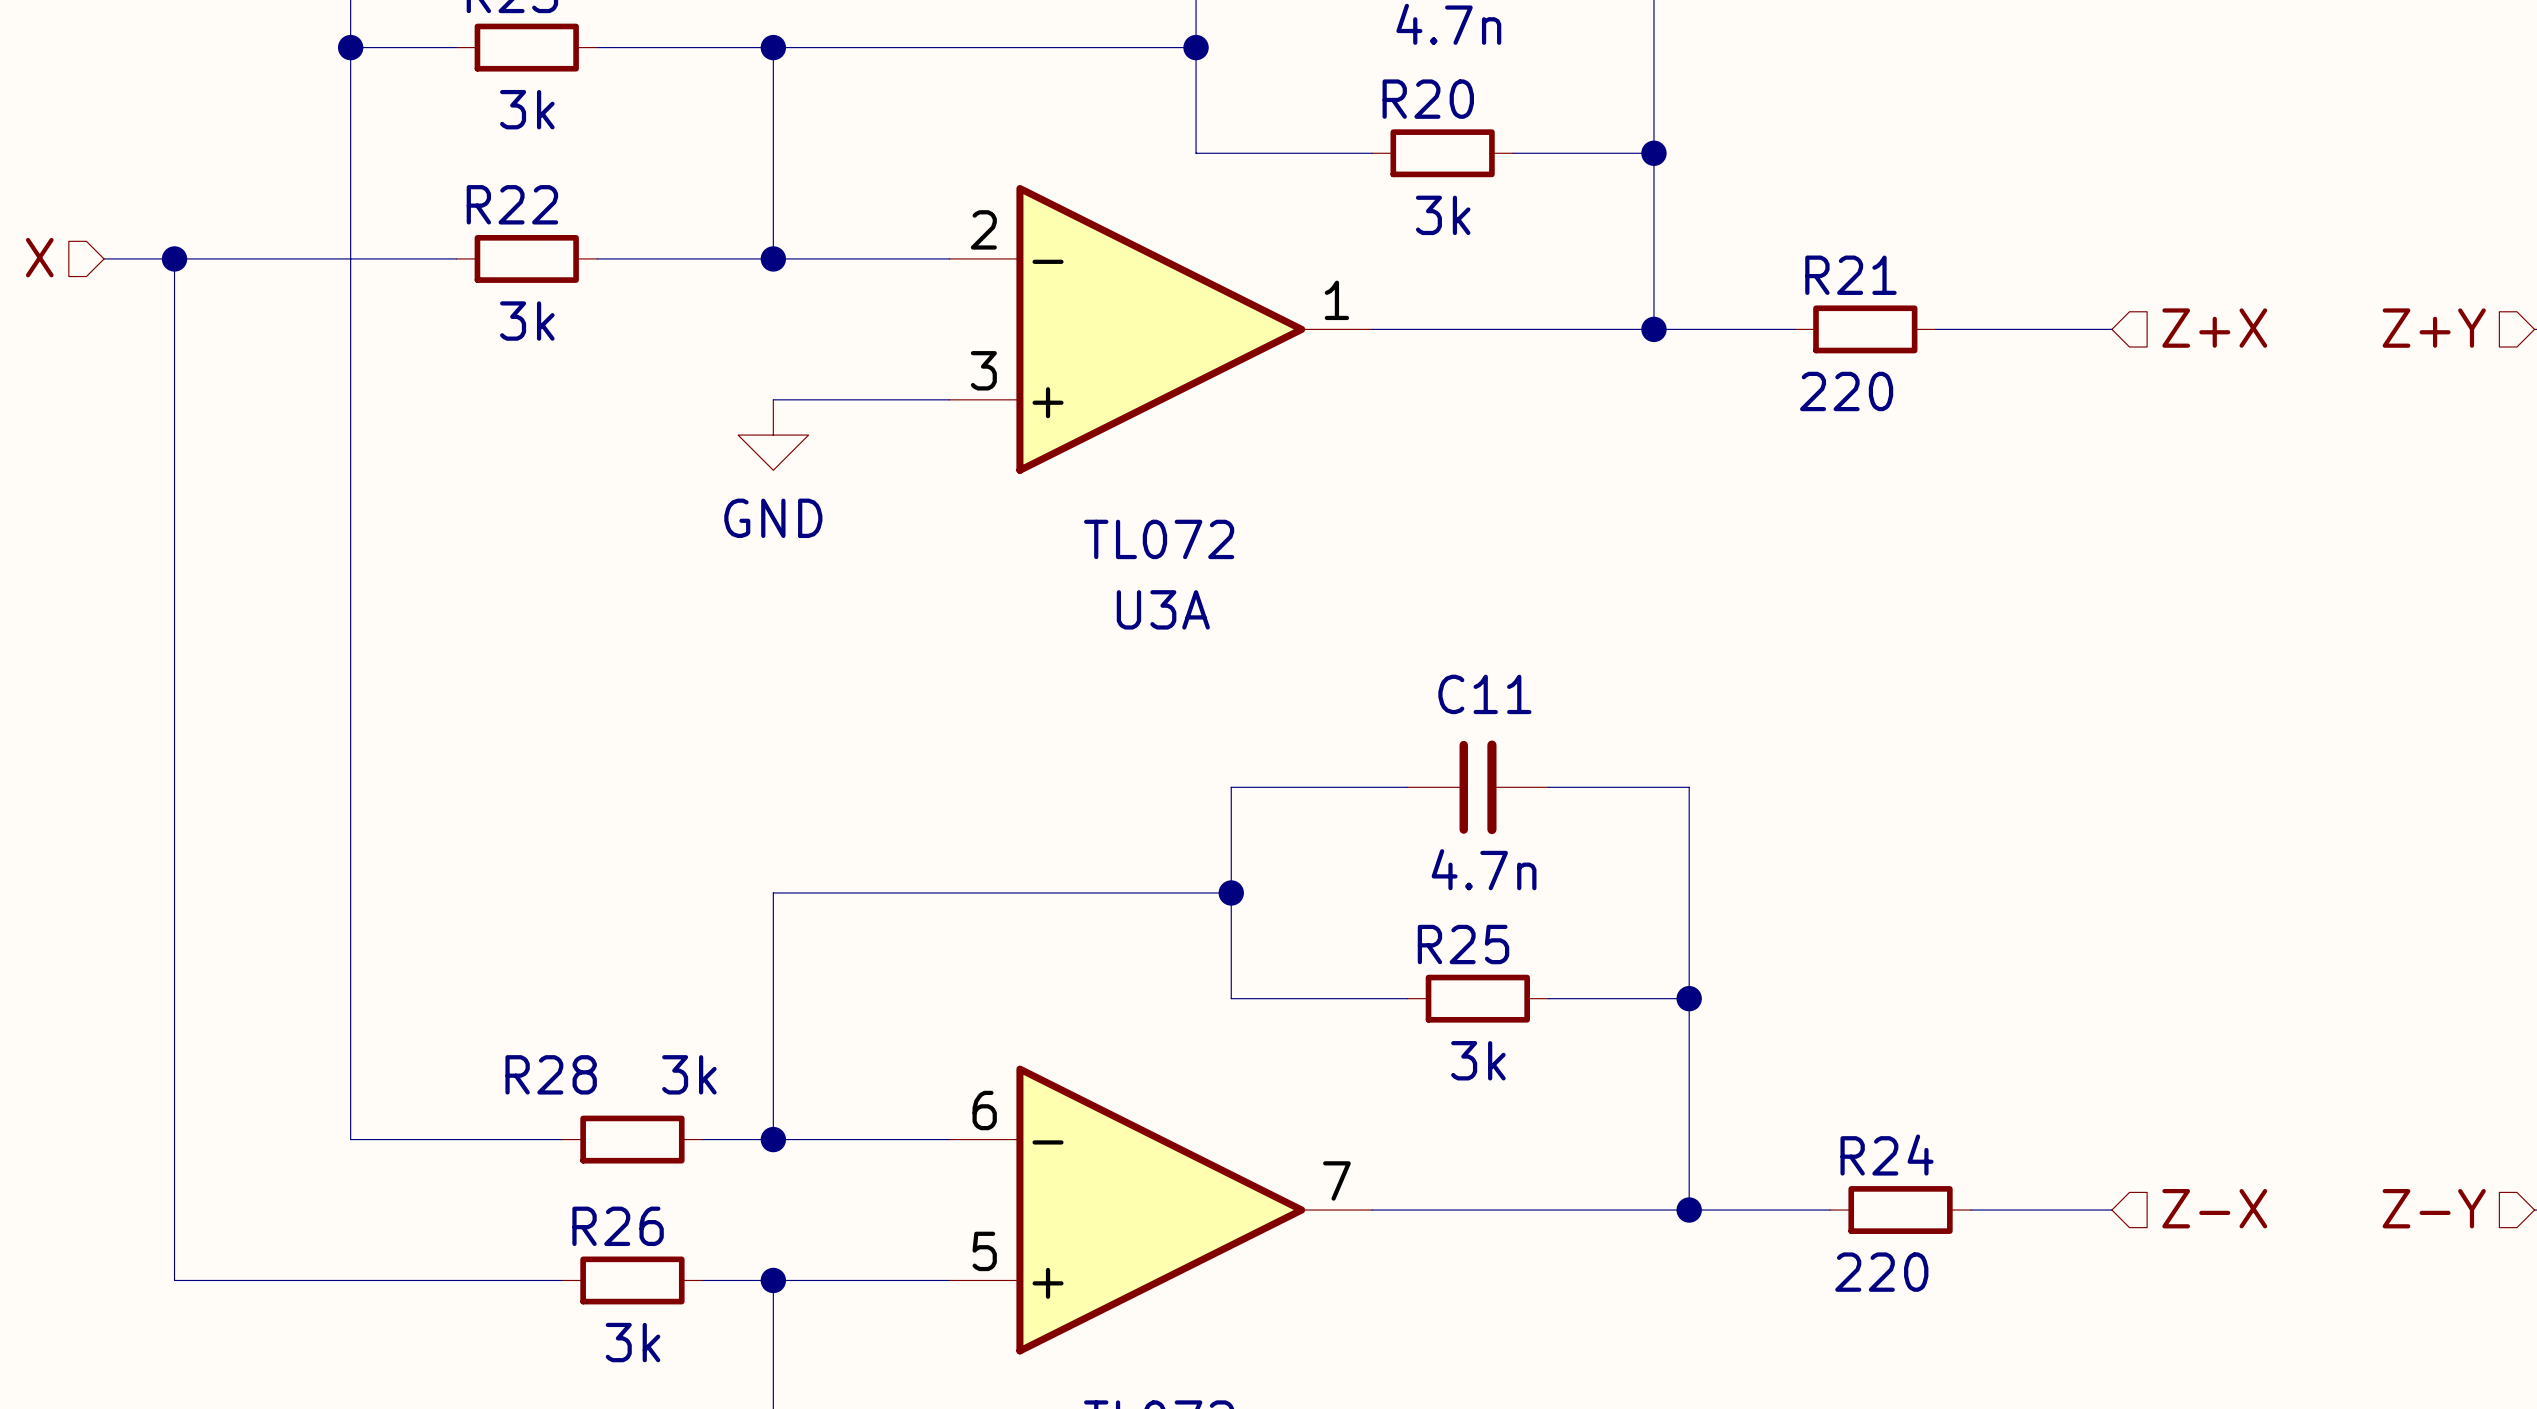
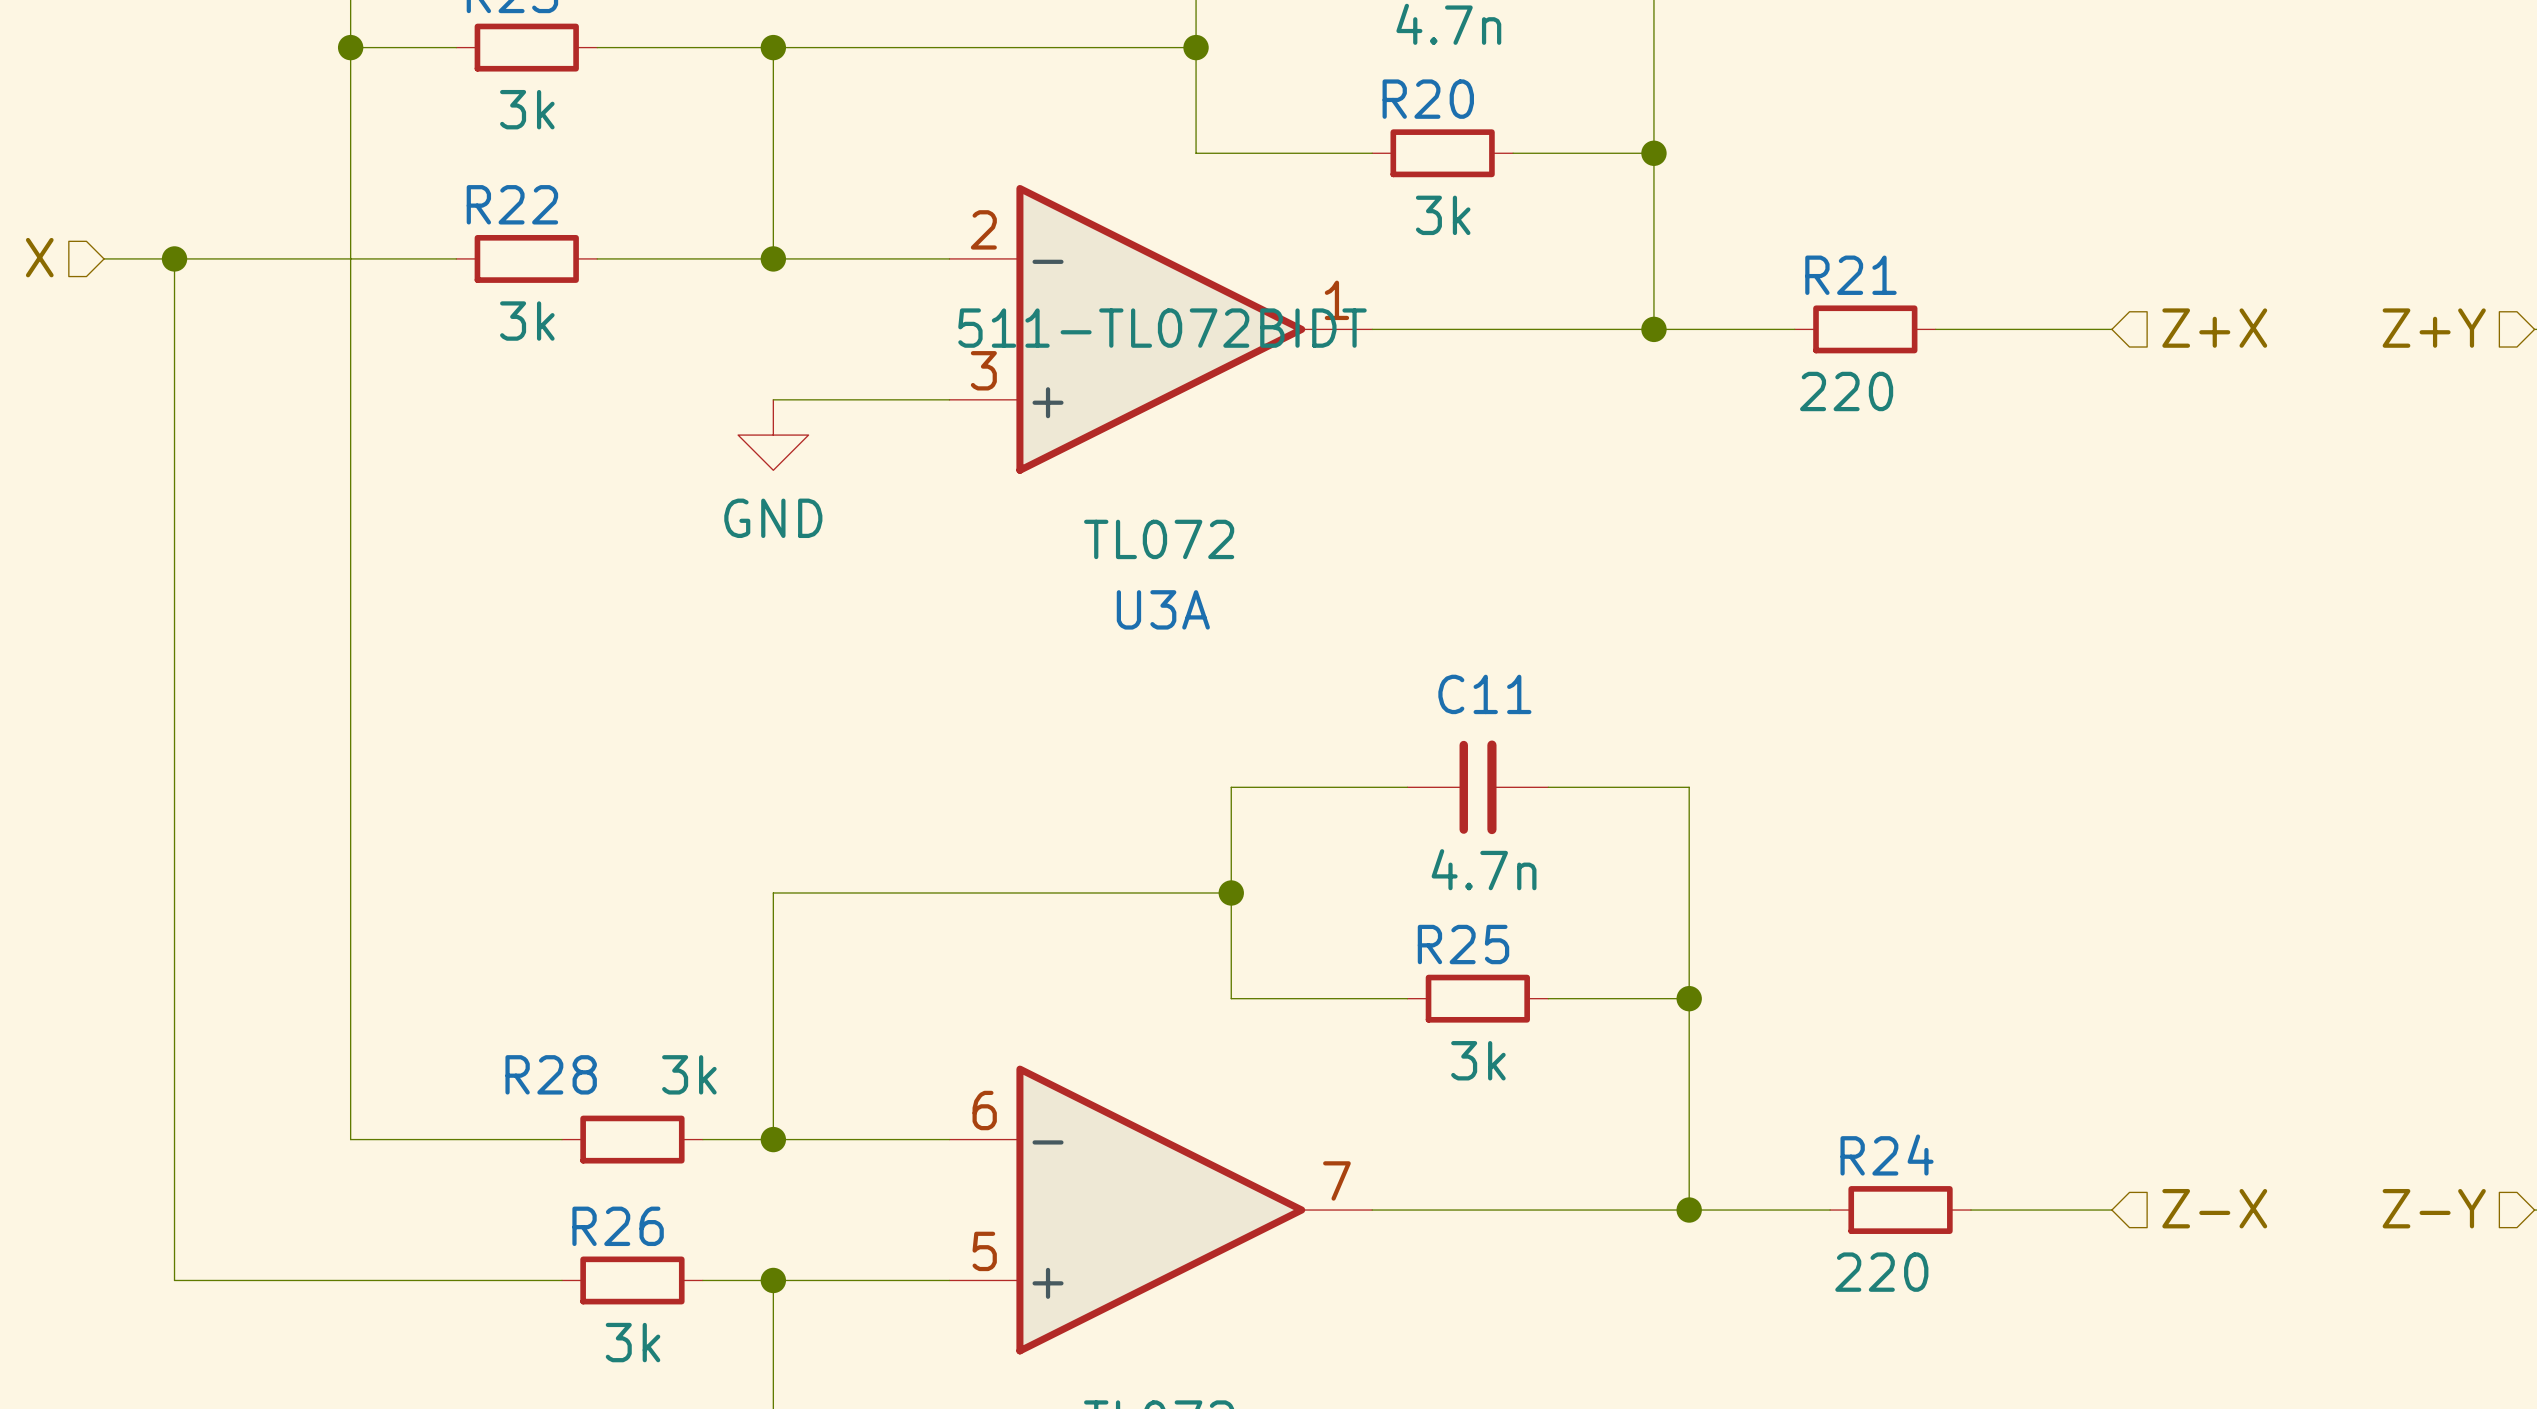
U3A text: none -> 511-TL072BIDT (1162, 328)

